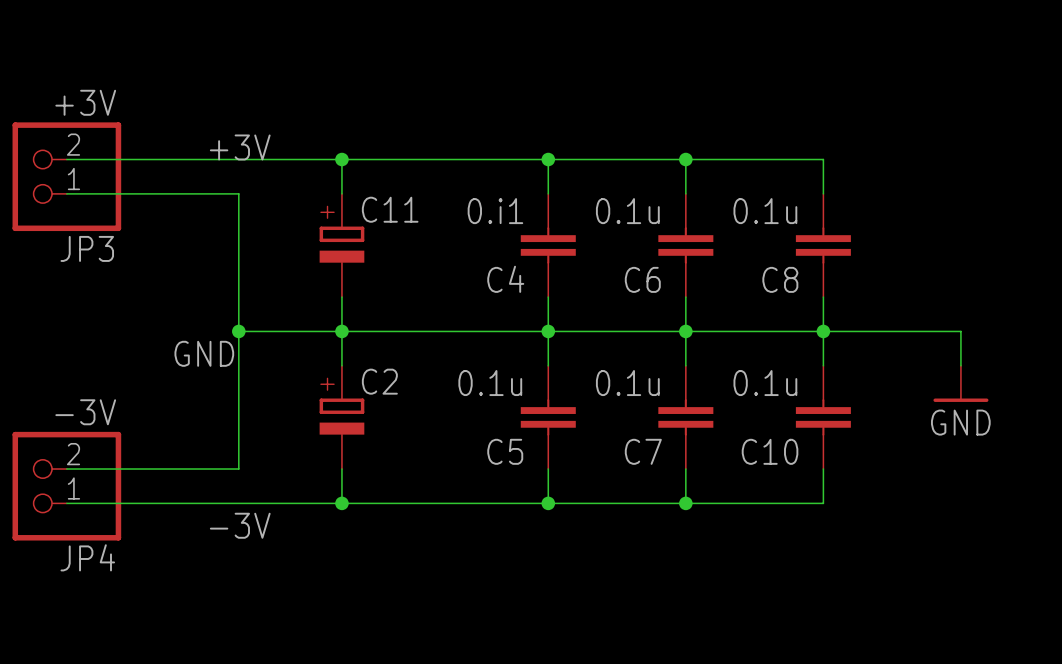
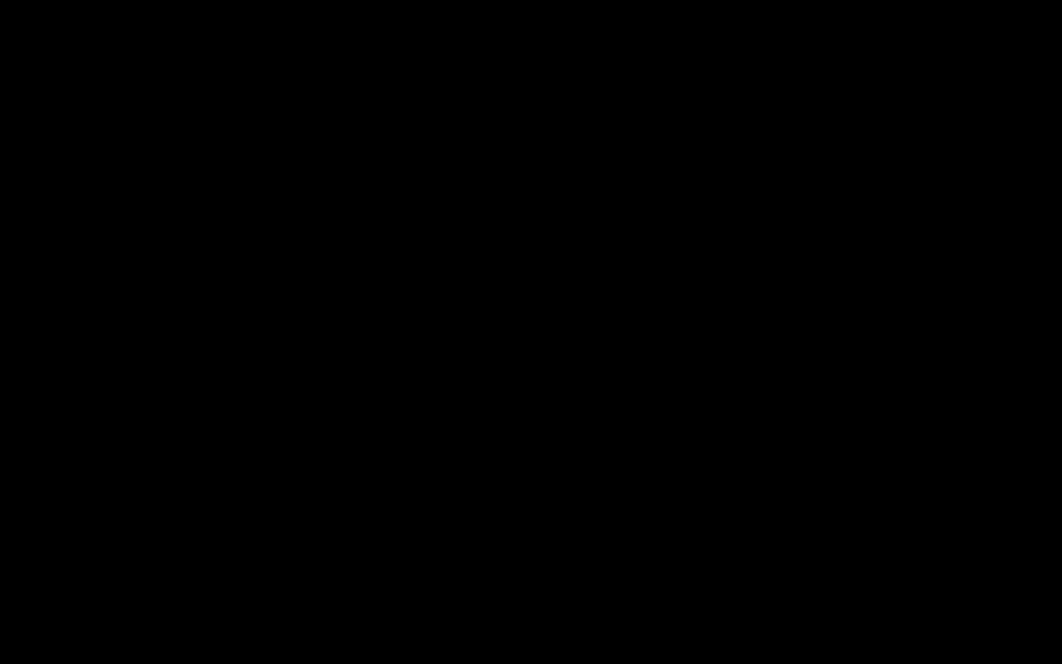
label: +3V (240, 147) -> none
wire: (66, 159) (823, 159) (823, 193) -> none
wire: (341, 159) (341, 193) -> none
junction: (341, 159) -> none
wire: (548, 159) (548, 193) -> none
junction: (548, 159) -> none
wire: (685, 159) (685, 193) -> none
junction: (685, 159) -> none
JP3: +3V (66, 176) -> none
wire: (66, 193) (238, 193) (238, 469) (66, 469) -> none
C11: (341, 245) -> none
C4: 0.i1 (548, 245) -> none
C6: 0.1u (685, 245) -> none
C8: 0.1u (823, 245) -> none
wire: (341, 297) (341, 365) -> none
wire: (548, 297) (548, 365) -> none
wire: (685, 297) (685, 365) -> none
wire: (823, 297) (823, 365) -> none
wire: (238, 331) (960, 331) (960, 365) -> none
junction: (238, 331) -> none
junction: (341, 331) -> none
junction: (548, 331) -> none
junction: (685, 331) -> none
junction: (823, 331) -> none
label: GND (204, 353) -> none
power symbol: GND (960, 383) -> none
C2: (341, 417) -> none
C5: 0.1u (548, 417) -> none
C7: 0.1u (685, 417) -> none
C10: 0.1u (823, 417) -> none
wire: (341, 469) (341, 503) -> none
wire: (548, 469) (548, 503) -> none
wire: (685, 469) (685, 503) -> none
wire: (823, 469) (823, 503) (66, 503) -> none
JP4: -3V (66, 486) -> none
junction: (341, 503) -> none
junction: (548, 503) -> none
junction: (685, 503) -> none
label: -3V (240, 525) -> none

